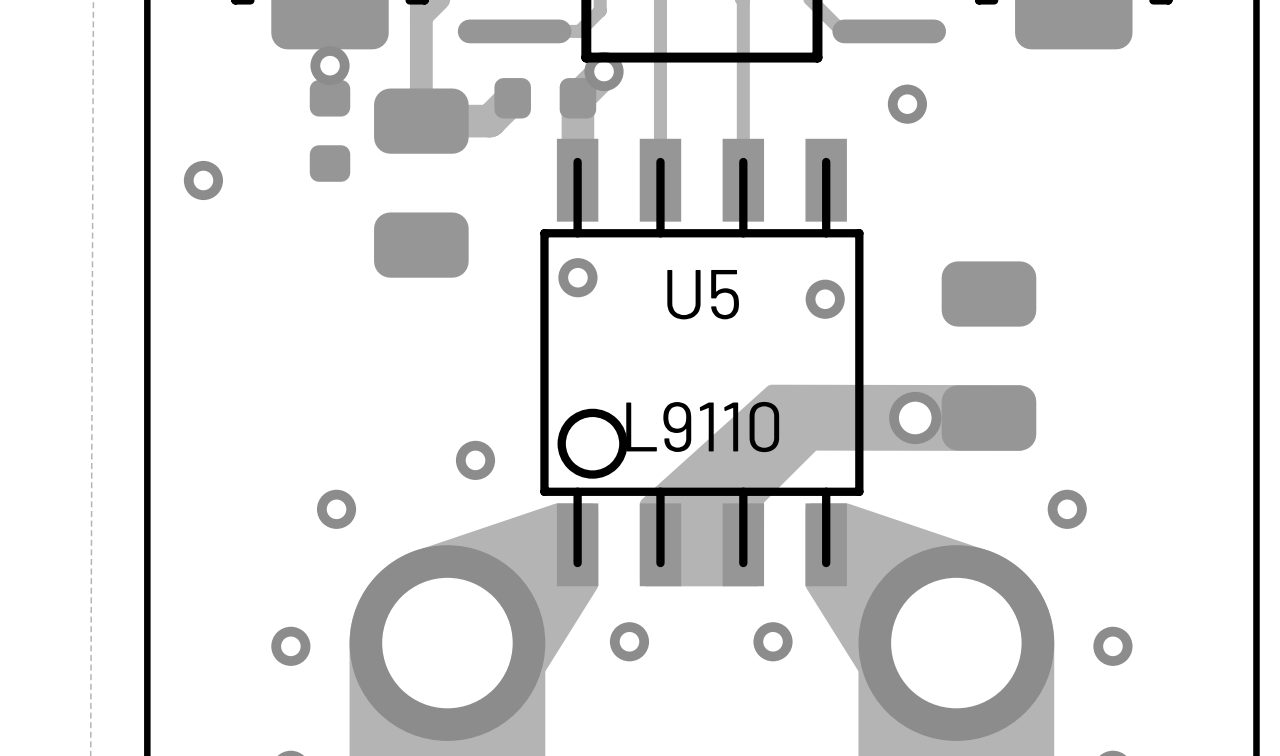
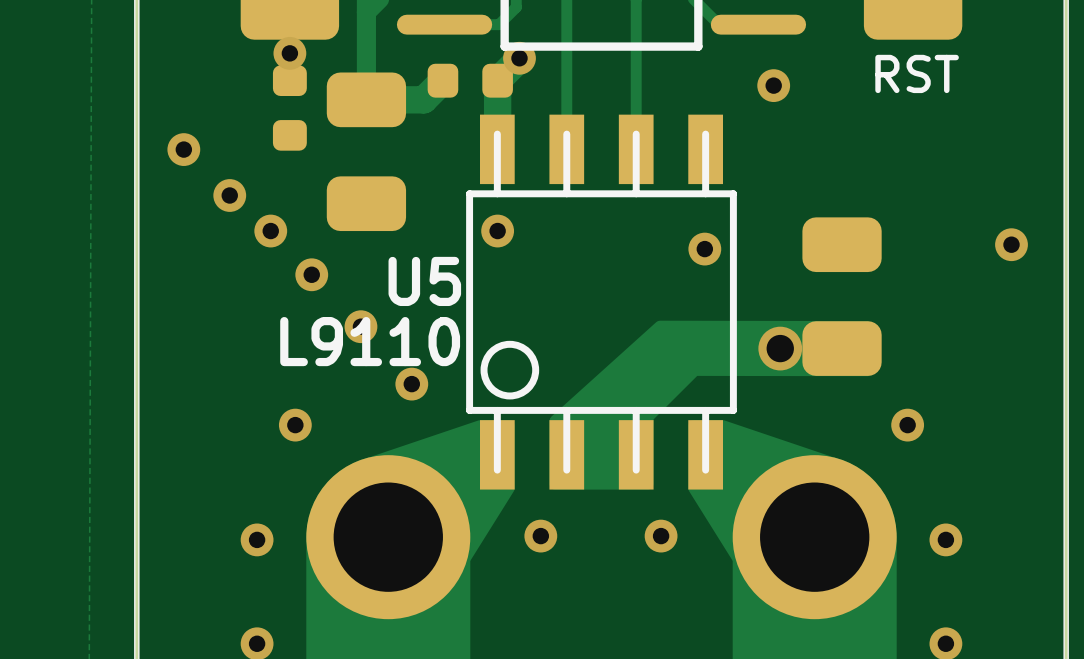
text: none -> RST (917, 73)
via: none -> (229, 195)
via: none -> (270, 231)
U5 name position: U5 (703, 294) -> U5 (424, 281)
via: none -> (1011, 244)
via: none -> (311, 274)
via: none -> (360, 326)
U5 value position: L9110 (702, 427) -> L9110 (370, 341)

